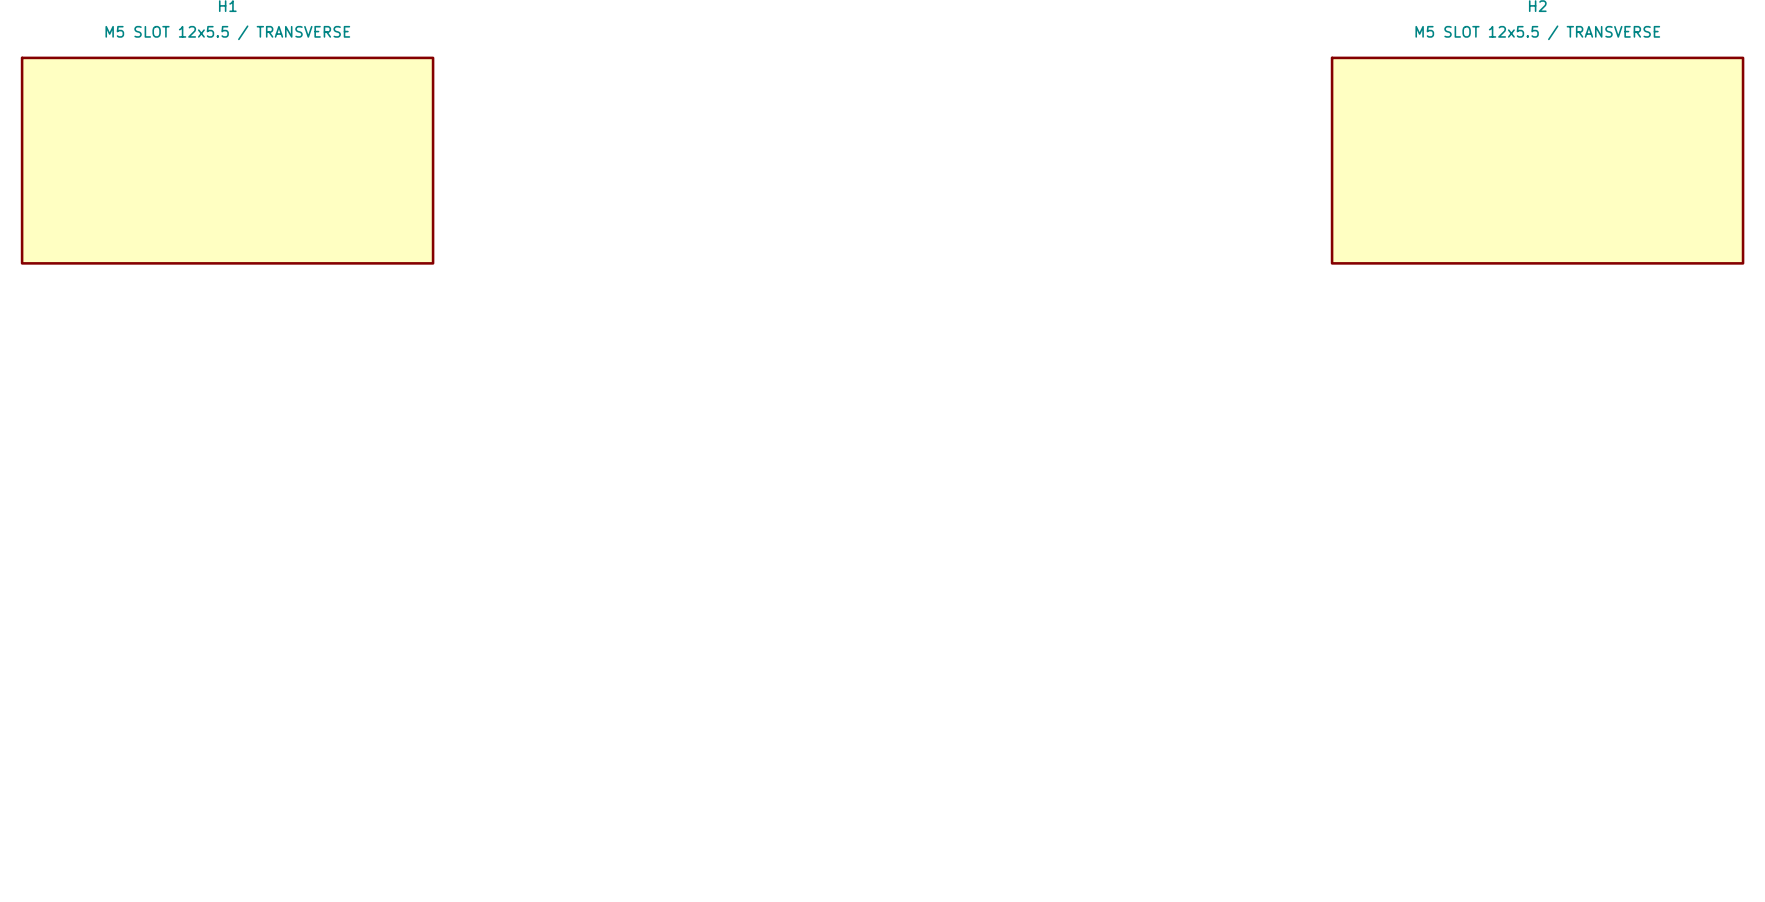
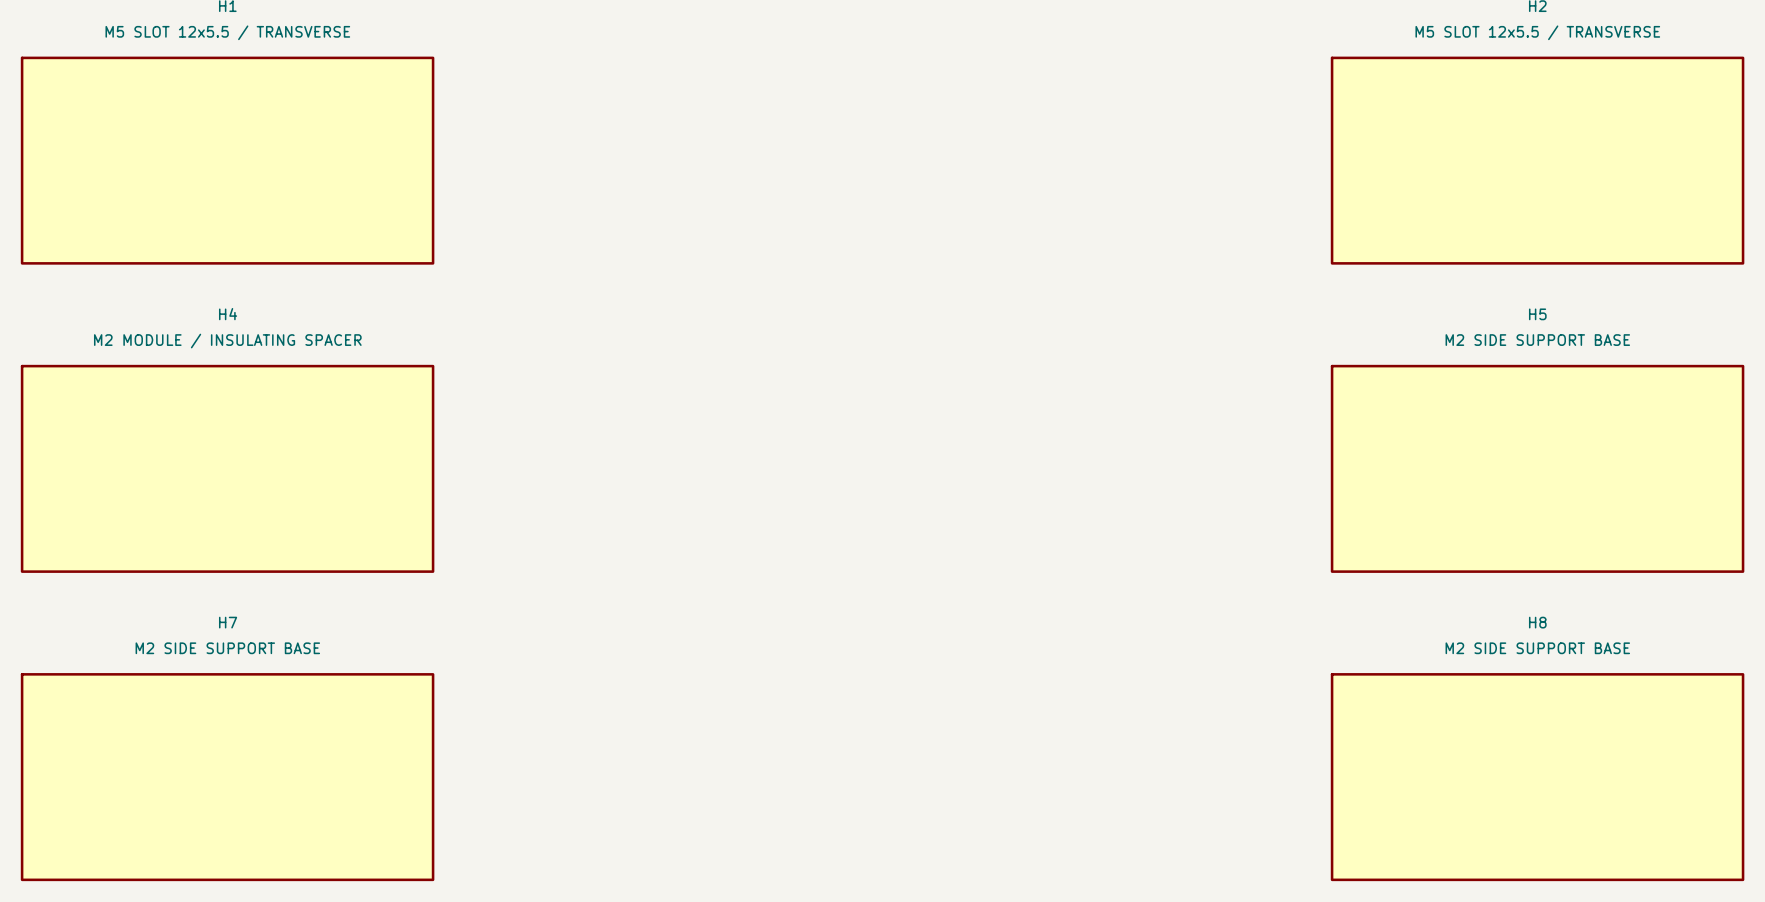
H4: none -> M2 MODULE / INSULATING SPACER (227, 468)
H5: none -> M2 SIDE SUPPORT BASE (1537, 468)
H7: none -> M2 SIDE SUPPORT BASE (227, 777)
H8: none -> M2 SIDE SUPPORT BASE (1537, 777)

